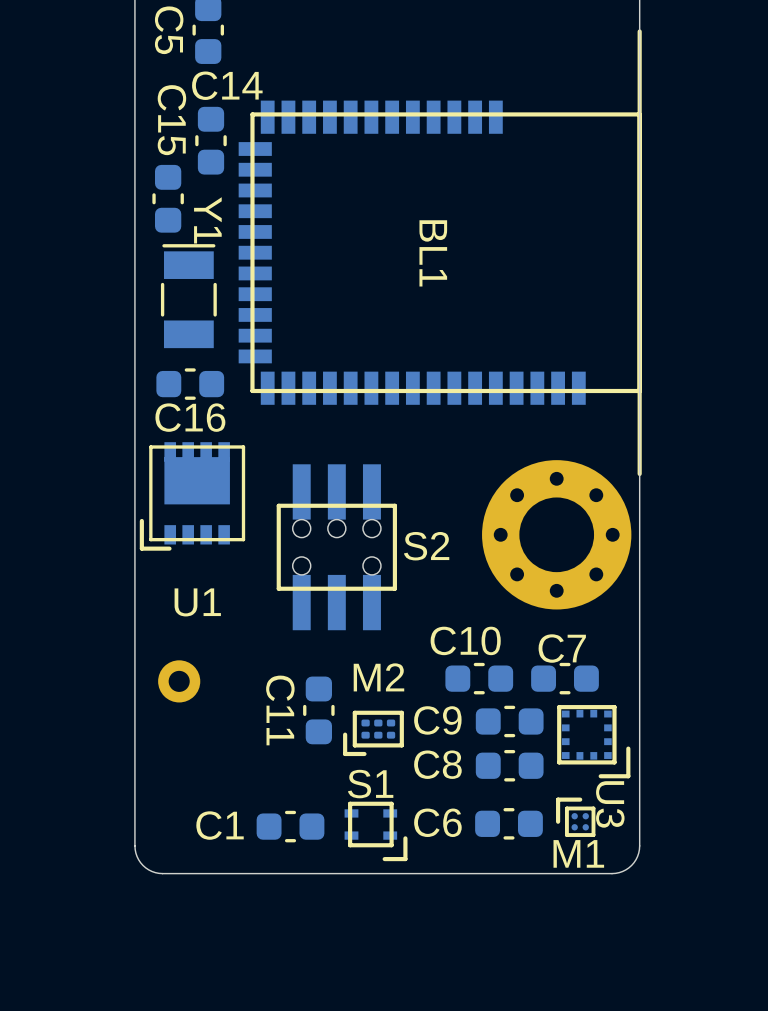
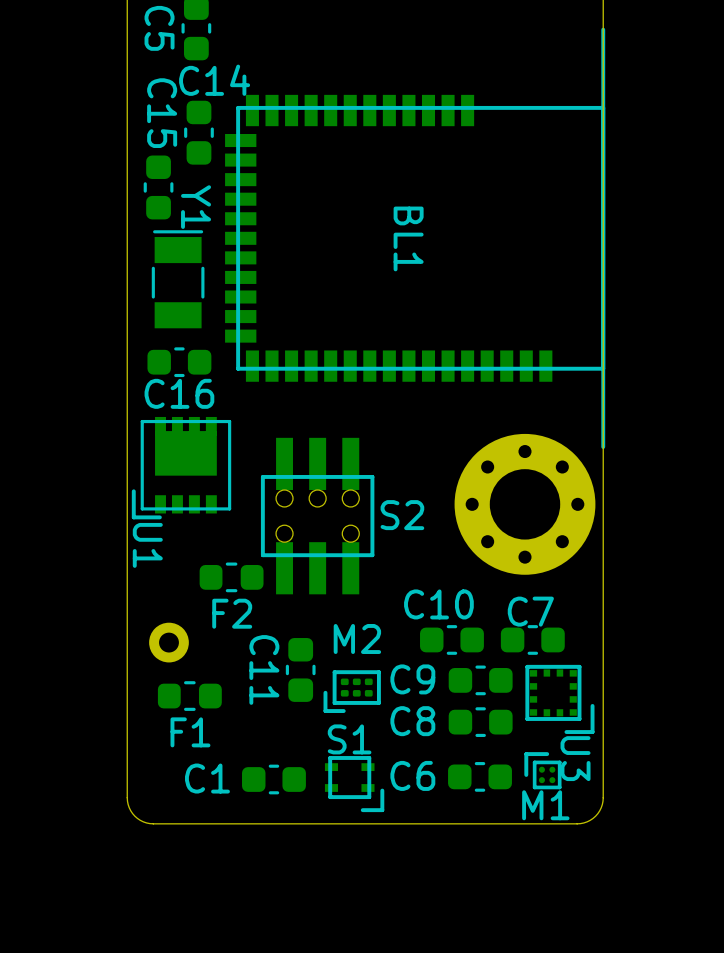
U1 name rotation: 0° (197, 602) -> 90° clockwise (147, 545)
F2: none -> (231, 577)
F1: none -> (189, 696)

